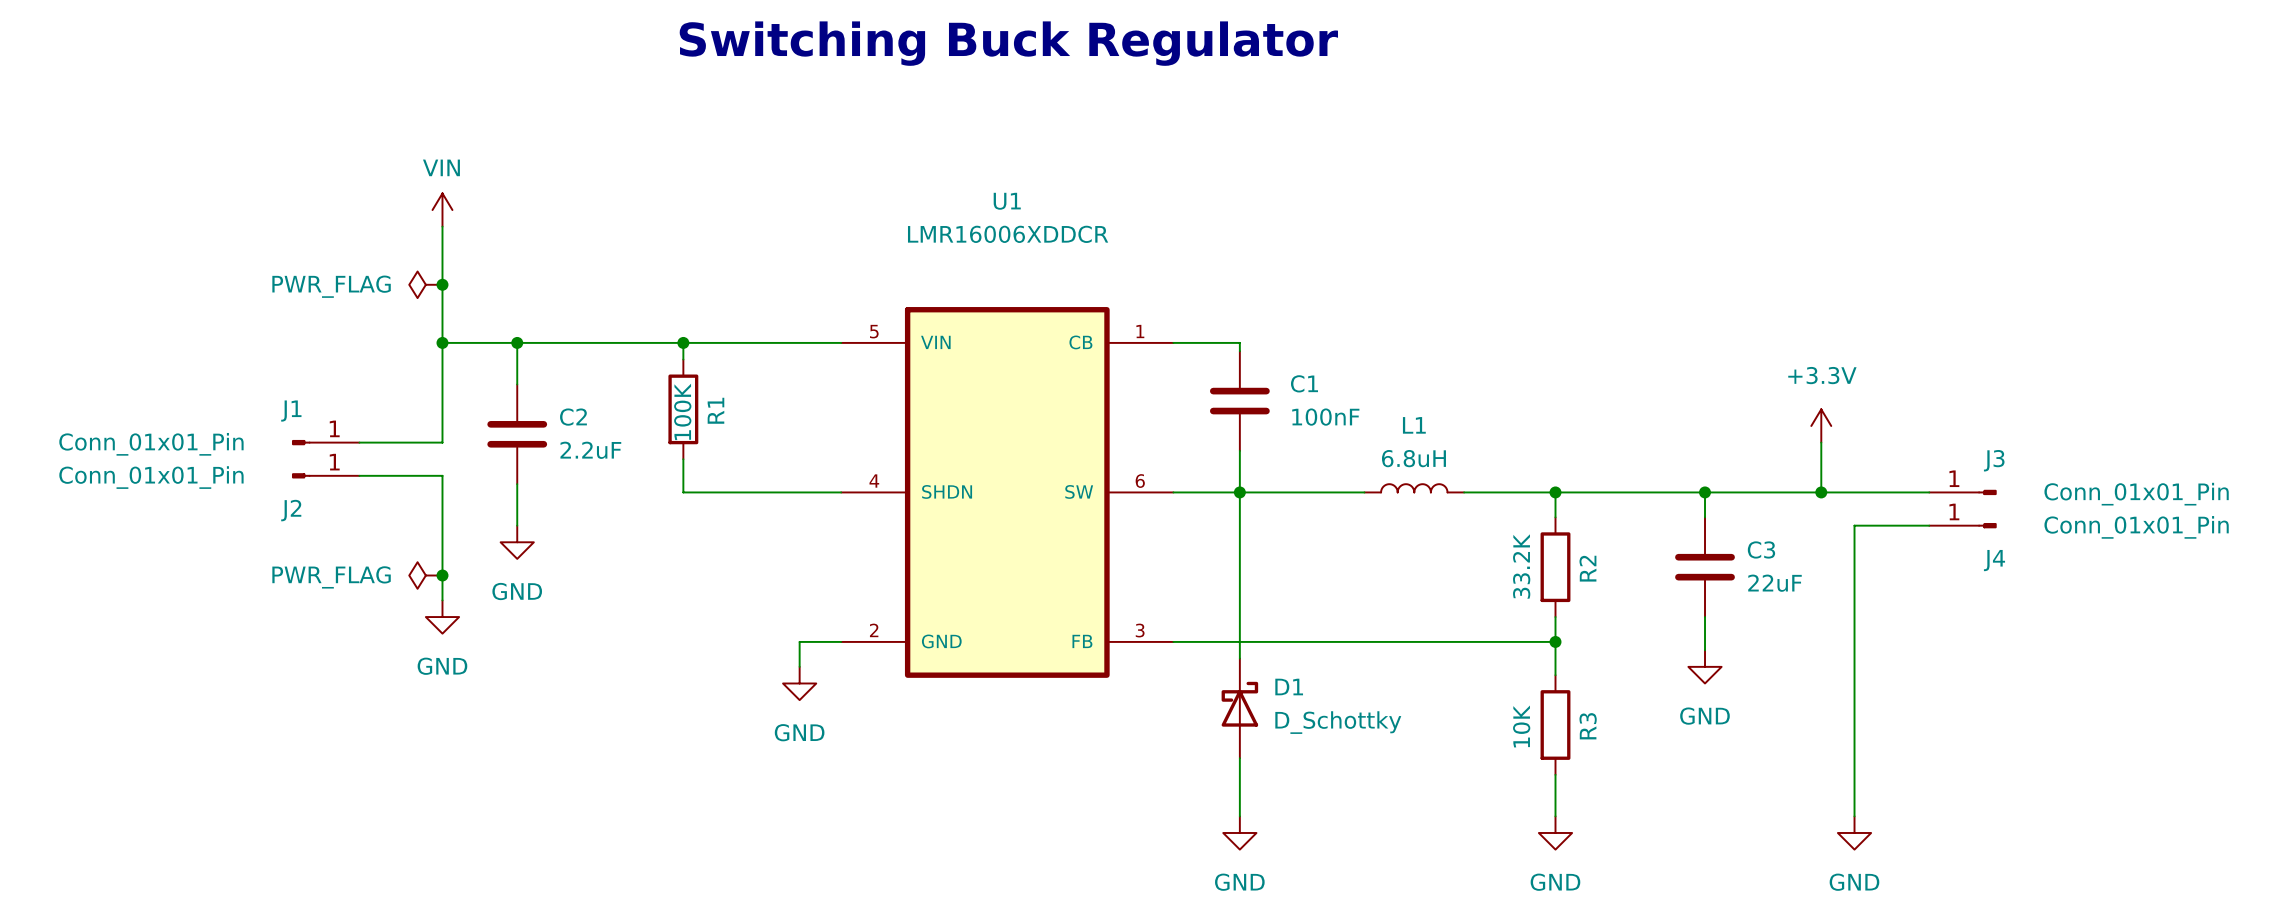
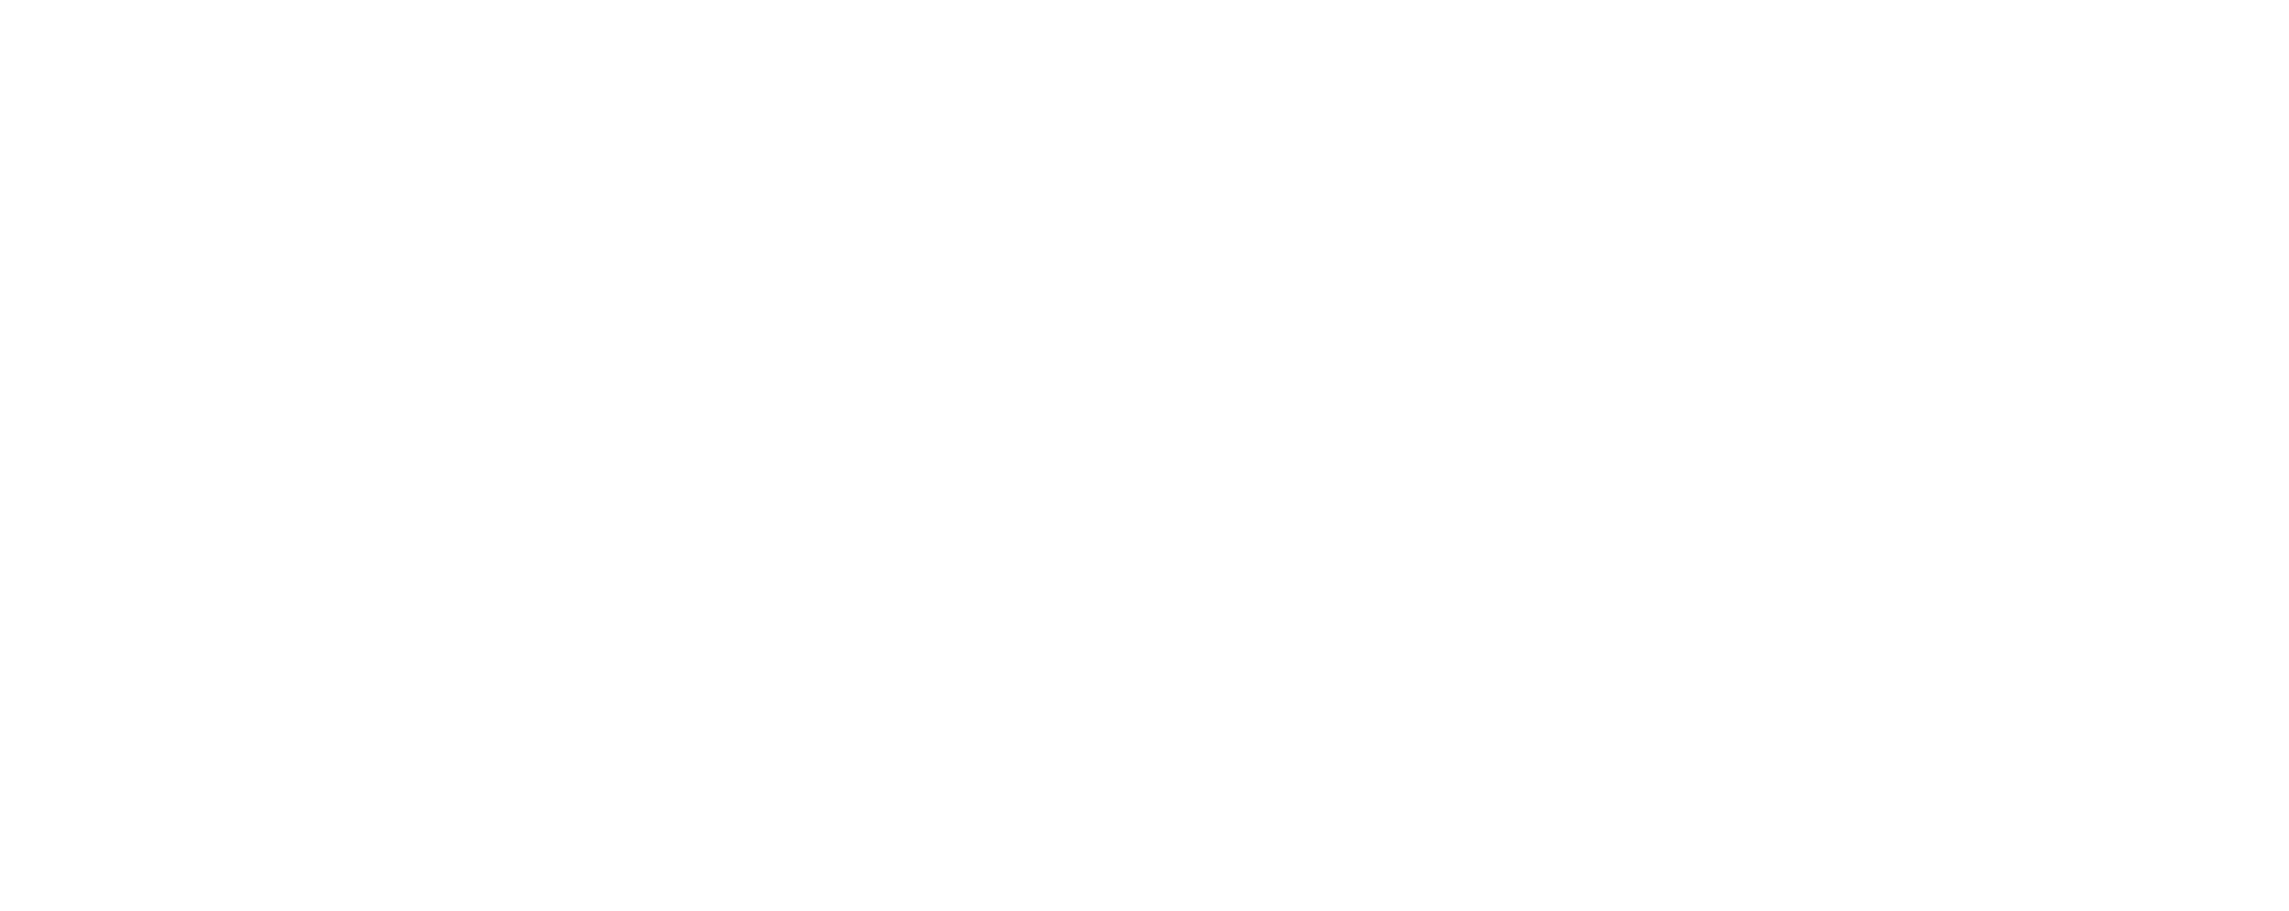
text: Switching Buck Regulator (1008, 43) -> none
power symbol: VIN (442, 210) -> none
wire: (442, 226) (442, 442) (359, 442) -> none
power symbol: PWR_FLAG (425, 284) -> none
junction: (442, 284) -> none
wire: (442, 342) (841, 342) -> none
junction: (442, 342) -> none
wire: (517, 342) (517, 384) -> none
junction: (517, 342) -> none
wire: (683, 342) (683, 359) -> none
junction: (683, 342) -> none
wire: (1173, 342) (1239, 342) (1239, 351) -> none
C1: 100nF (1239, 401) -> none
R1: 100K (683, 409) -> none
power symbol: +3.3V (1821, 425) -> none
C2: 2.2uF (517, 434) -> none
J1: Conn_01x01_Pin (325, 442) -> none
wire: (1821, 442) (1821, 492) -> none
wire: (1239, 450) (1239, 658) -> none
wire: (683, 459) (683, 492) (841, 492) -> none
J2: Conn_01x01_Pin (325, 475) -> none
wire: (359, 475) (442, 475) (442, 600) -> none
wire: (517, 484) (517, 525) -> none
L1: 6.8uH (1414, 488) -> none
U1: LMR16006XDDCR (1007, 492) -> none
wire: (1173, 492) (1364, 492) -> none
junction: (1239, 492) -> none
wire: (1464, 492) (1929, 492) -> none
wire: (1555, 492) (1555, 517) -> none
junction: (1555, 492) -> none
wire: (1705, 492) (1705, 517) -> none
junction: (1705, 492) -> none
junction: (1821, 492) -> none
J3: Conn_01x01_Pin (1962, 492) -> none
wire: (1929, 525) (1854, 525) (1854, 816) -> none
J4: Conn_01x01_Pin (1962, 525) -> none
power symbol: GND (517, 542) -> none
R2: 33.2K (1555, 567) -> none
C3: 22uF (1705, 567) -> none
power symbol: PWR_FLAG (425, 575) -> none
junction: (442, 575) -> none
power symbol: GND (442, 617) -> none
wire: (1555, 617) (1555, 675) -> none
wire: (1705, 617) (1705, 650) -> none
wire: (841, 641) (799, 641) (799, 666) -> none
wire: (1173, 641) (1555, 641) -> none
junction: (1555, 641) -> none
power symbol: GND (1705, 666) -> none
power symbol: GND (799, 683) -> none
D1: D_Schottky (1239, 708) -> none
R3: 10K (1555, 725) -> none
wire: (1239, 758) (1239, 816) -> none
wire: (1555, 774) (1555, 816) -> none
power symbol: GND (1239, 832) -> none
power symbol: GND (1555, 832) -> none
power symbol: GND (1854, 832) -> none

